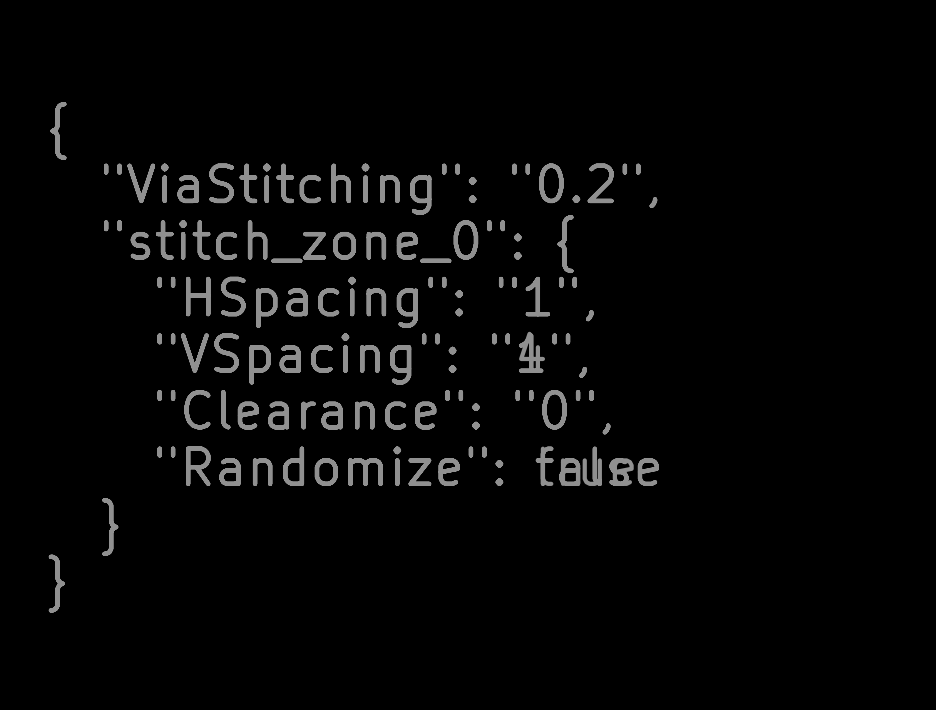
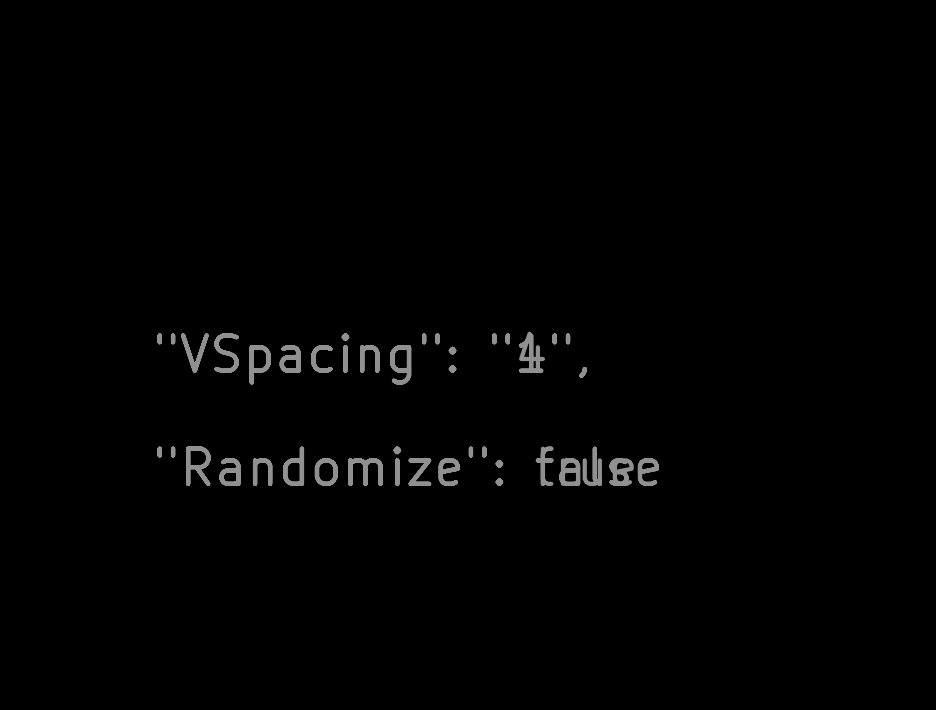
text: { (58, 130) -> none
text: "ViaStitching": "0.2", (380, 189) -> none
text: "stitch_zone_0": { (338, 244) -> none
text: "HSpacing": "1", (375, 302) -> none
text: "Clearance": "0", (383, 412) -> none
text: } (110, 527) -> none
text: } (56, 583) -> none

